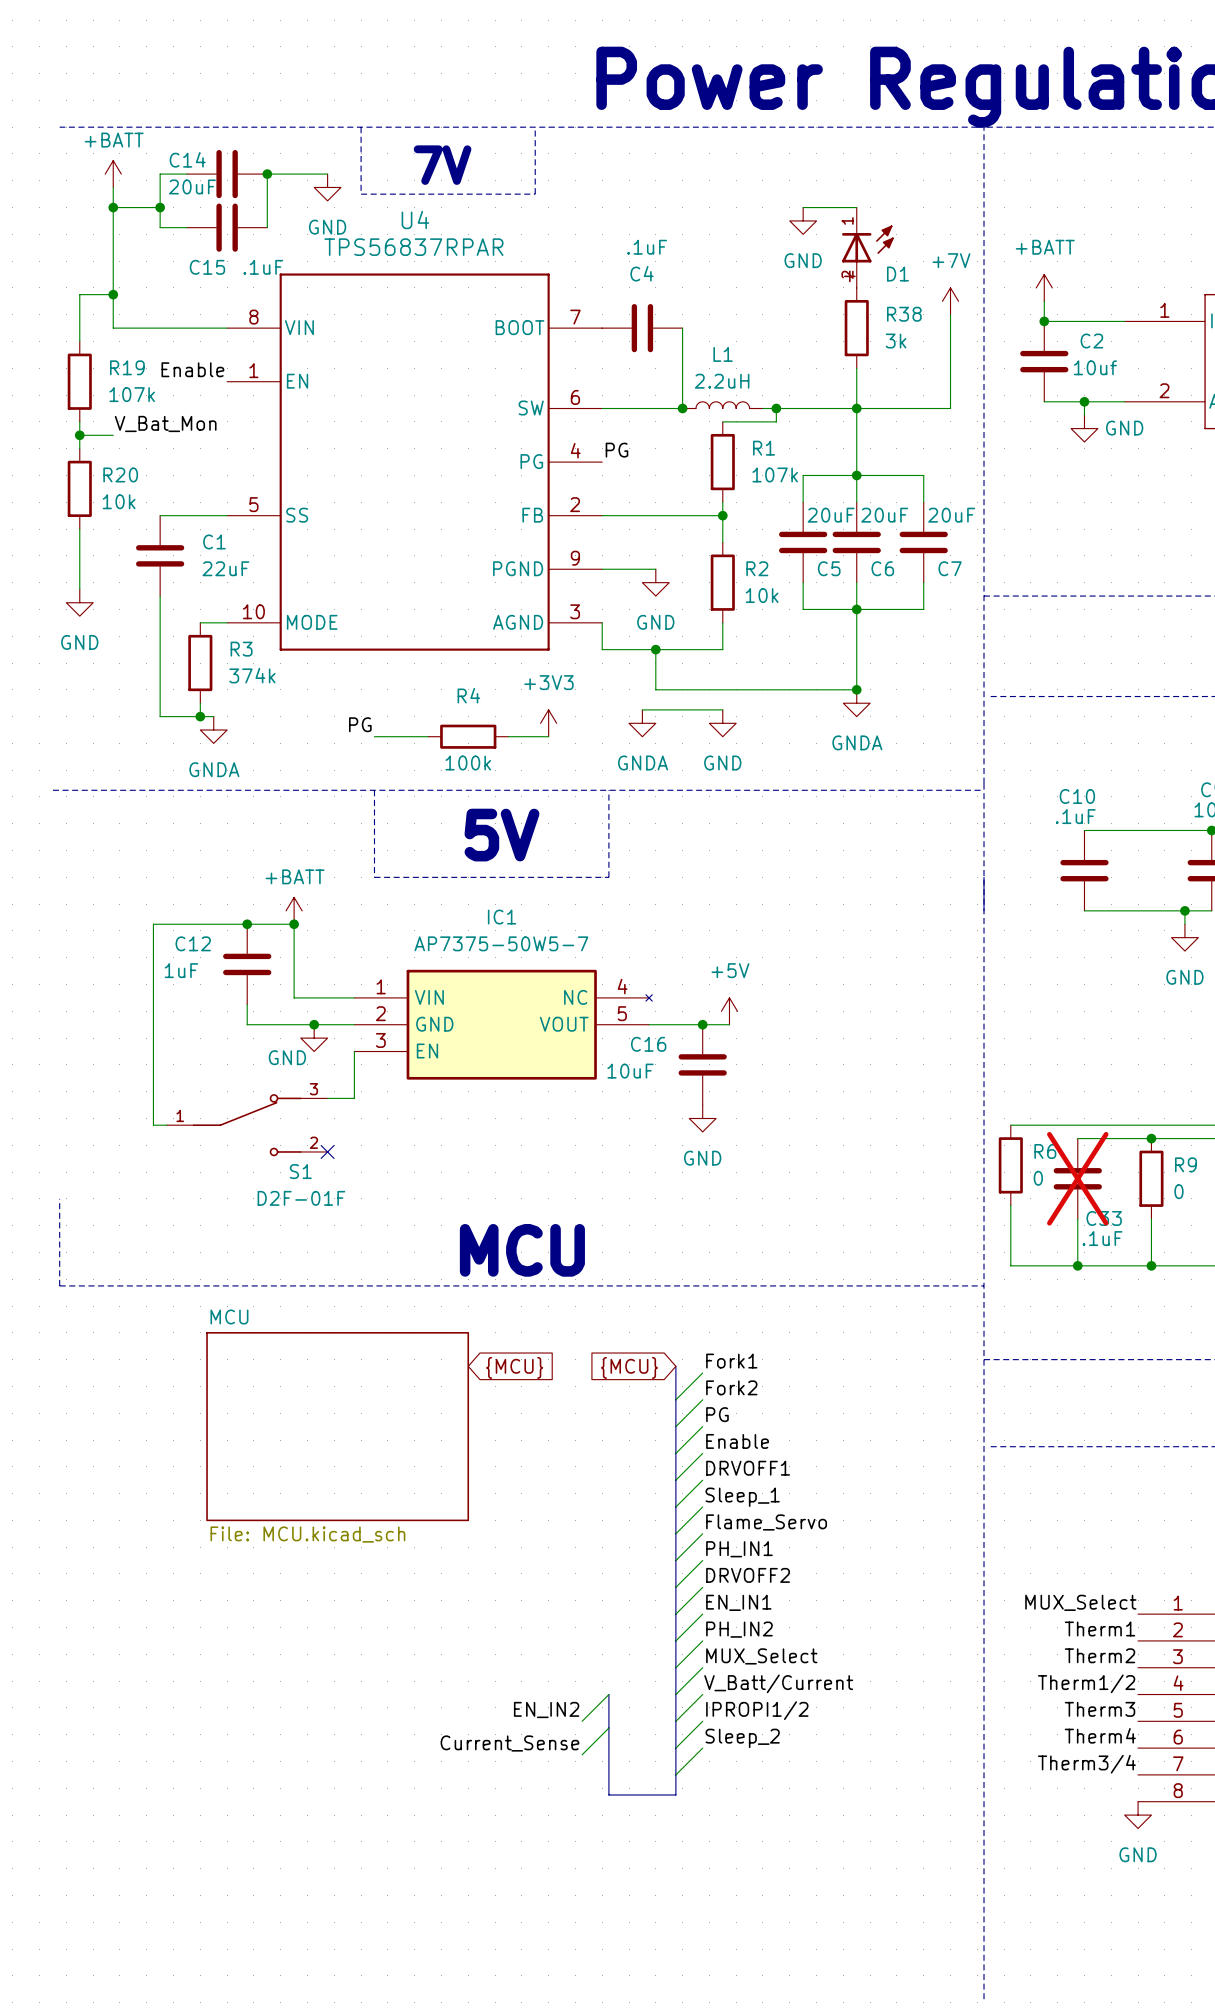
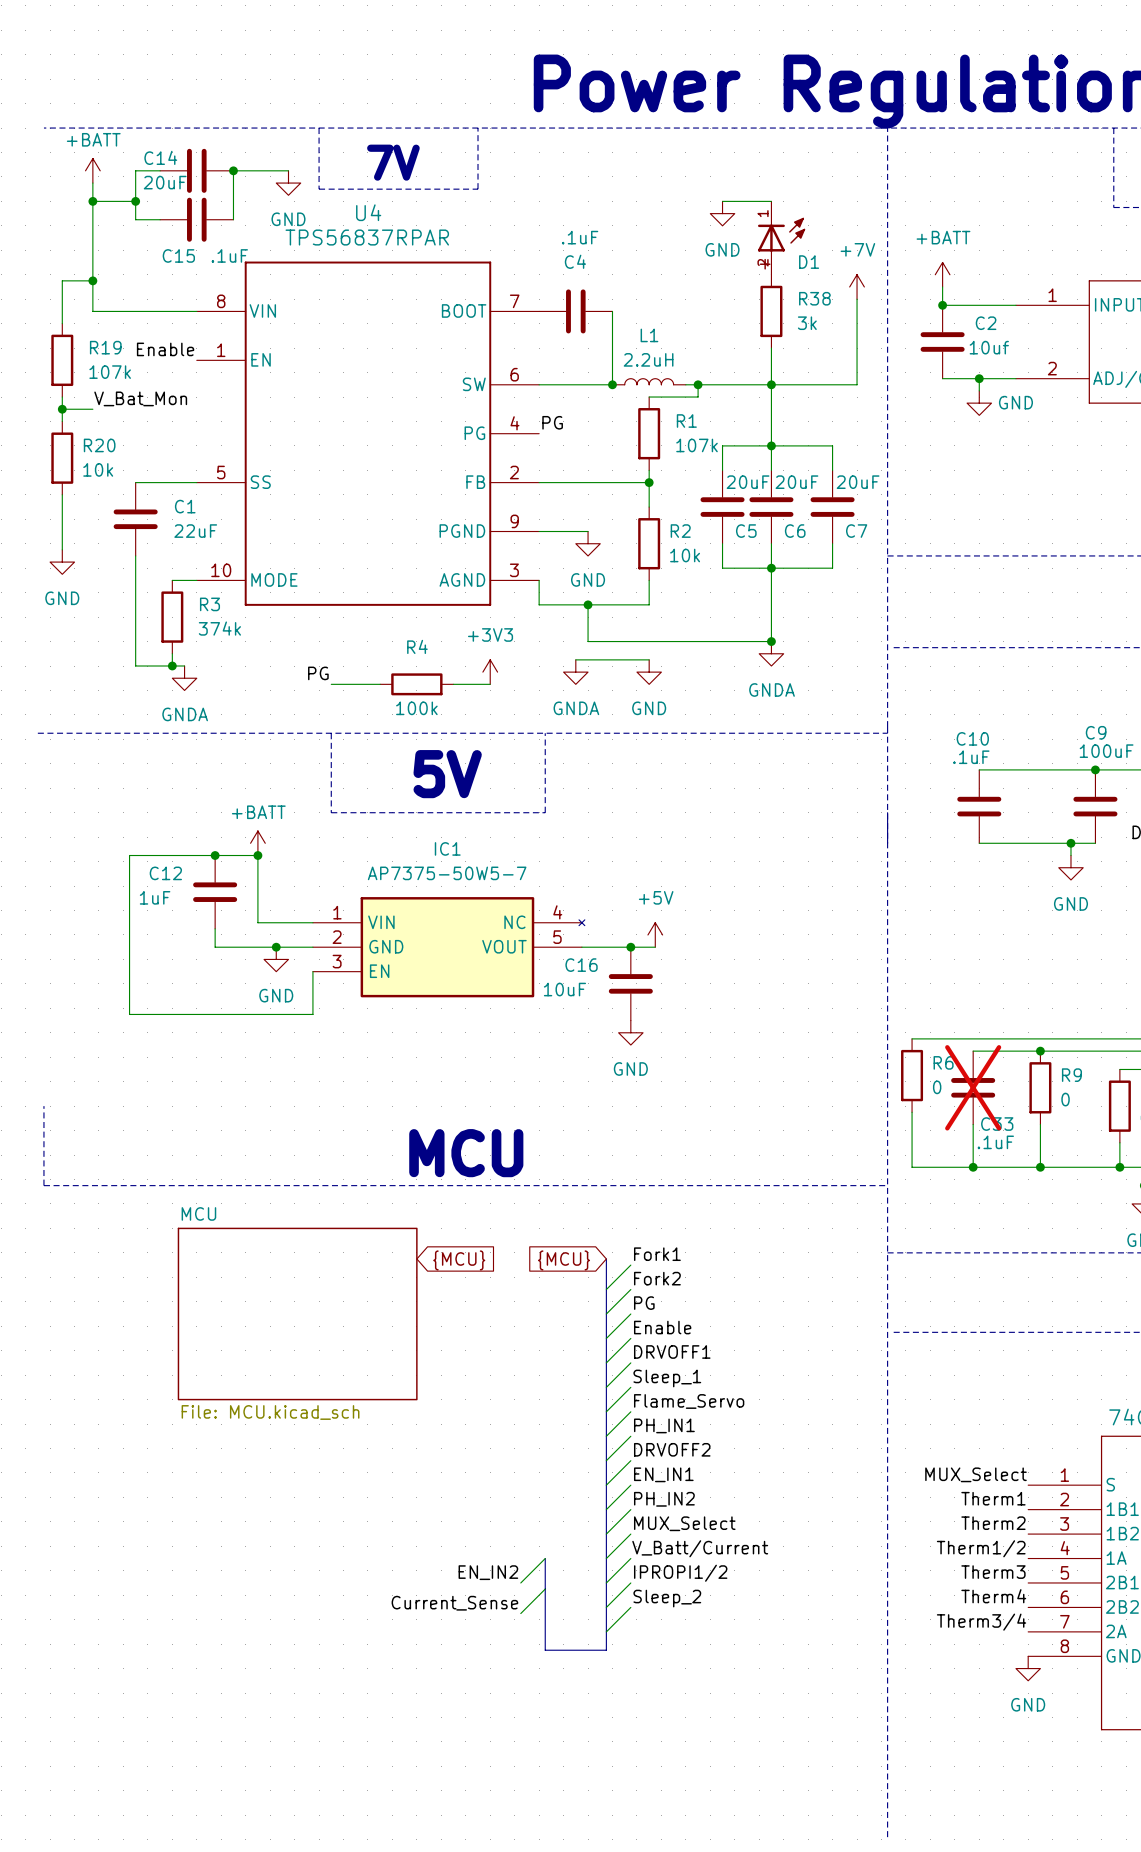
power symbol text position: GND (287, 1057) -> GND (276, 995)
wire: (153, 1098) (153, 1125) (166, 1125) -> (129, 1014) (288, 1014)
S1: D2F-01F (247, 1125) -> none
no-connect mark: (327, 1151) -> none

